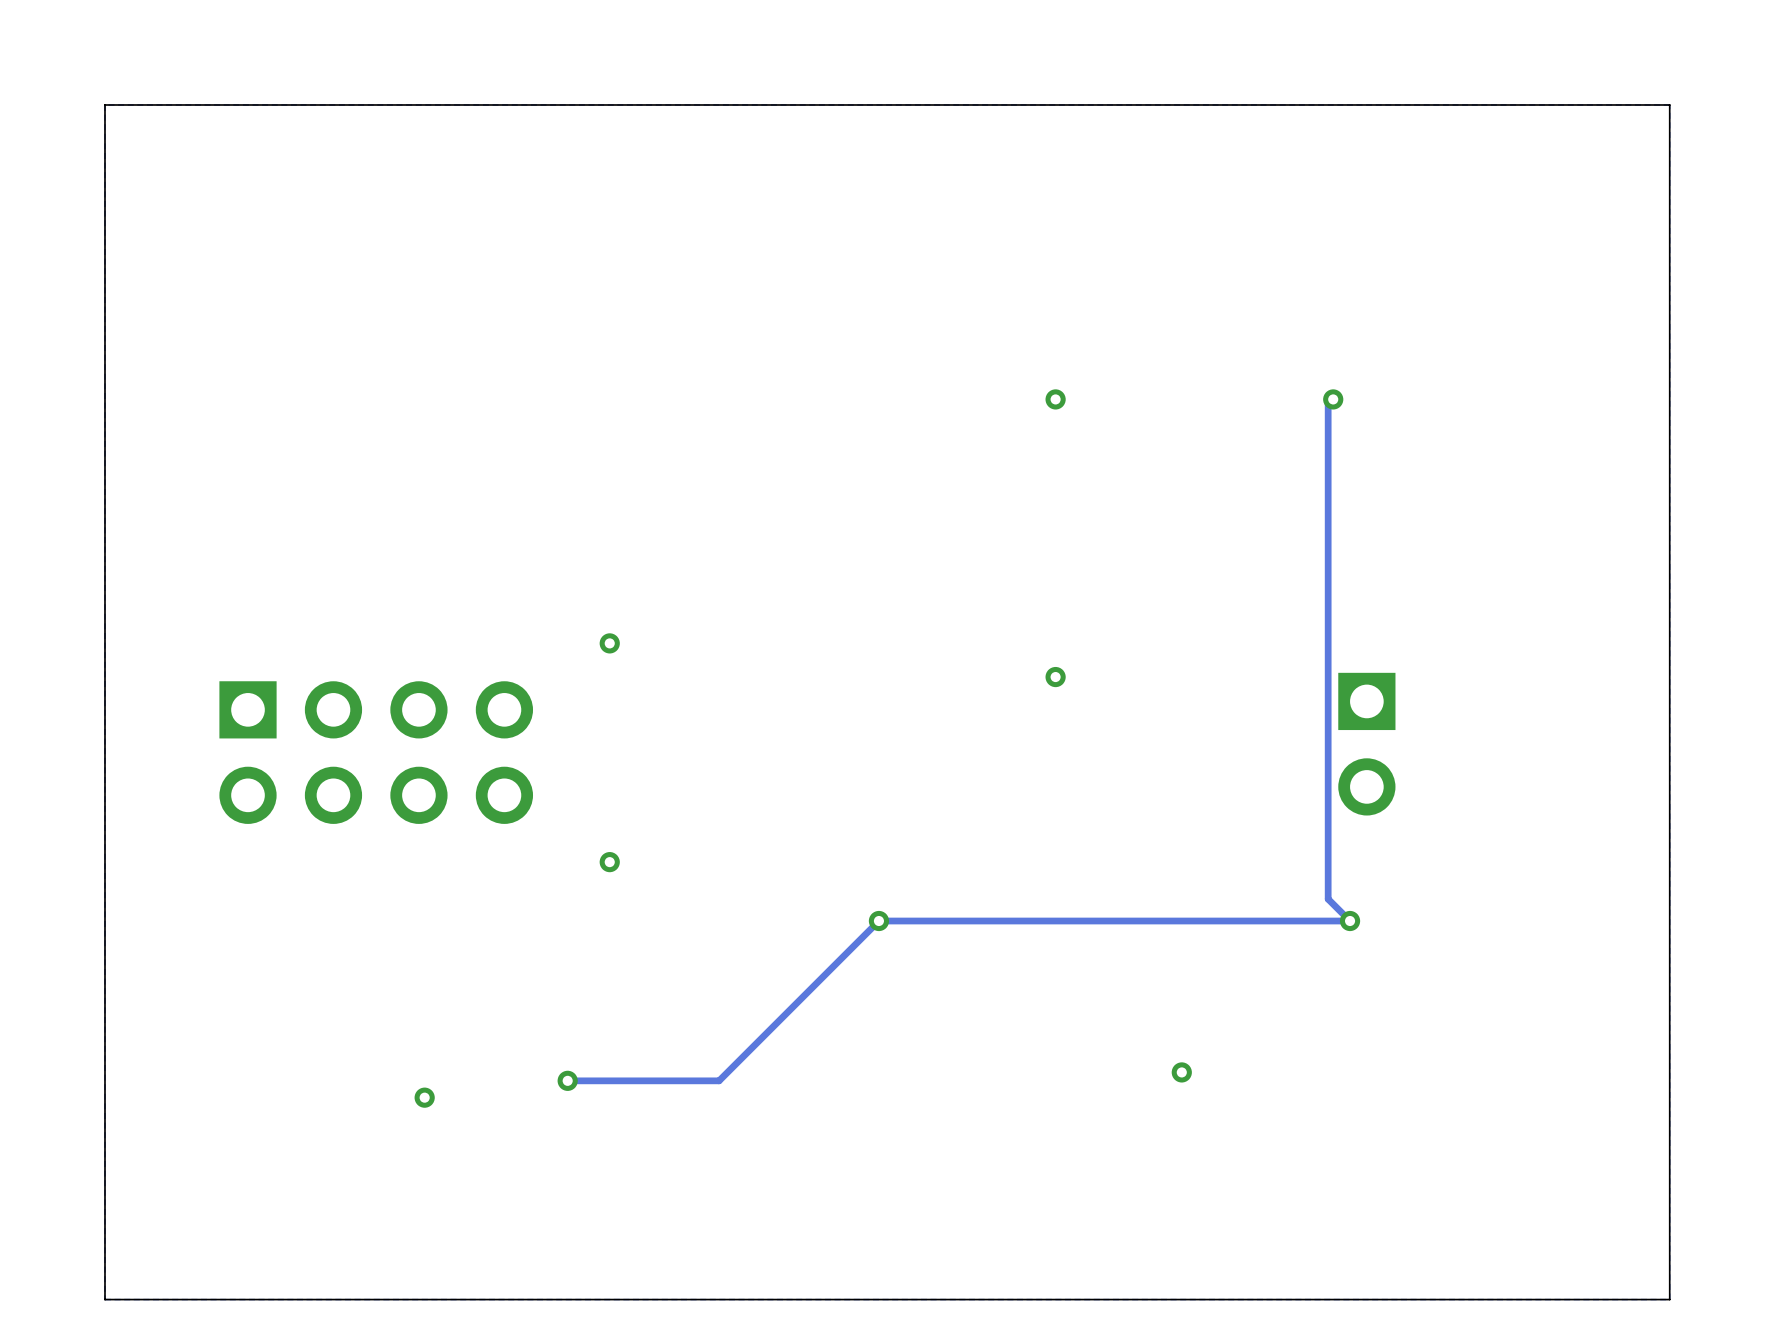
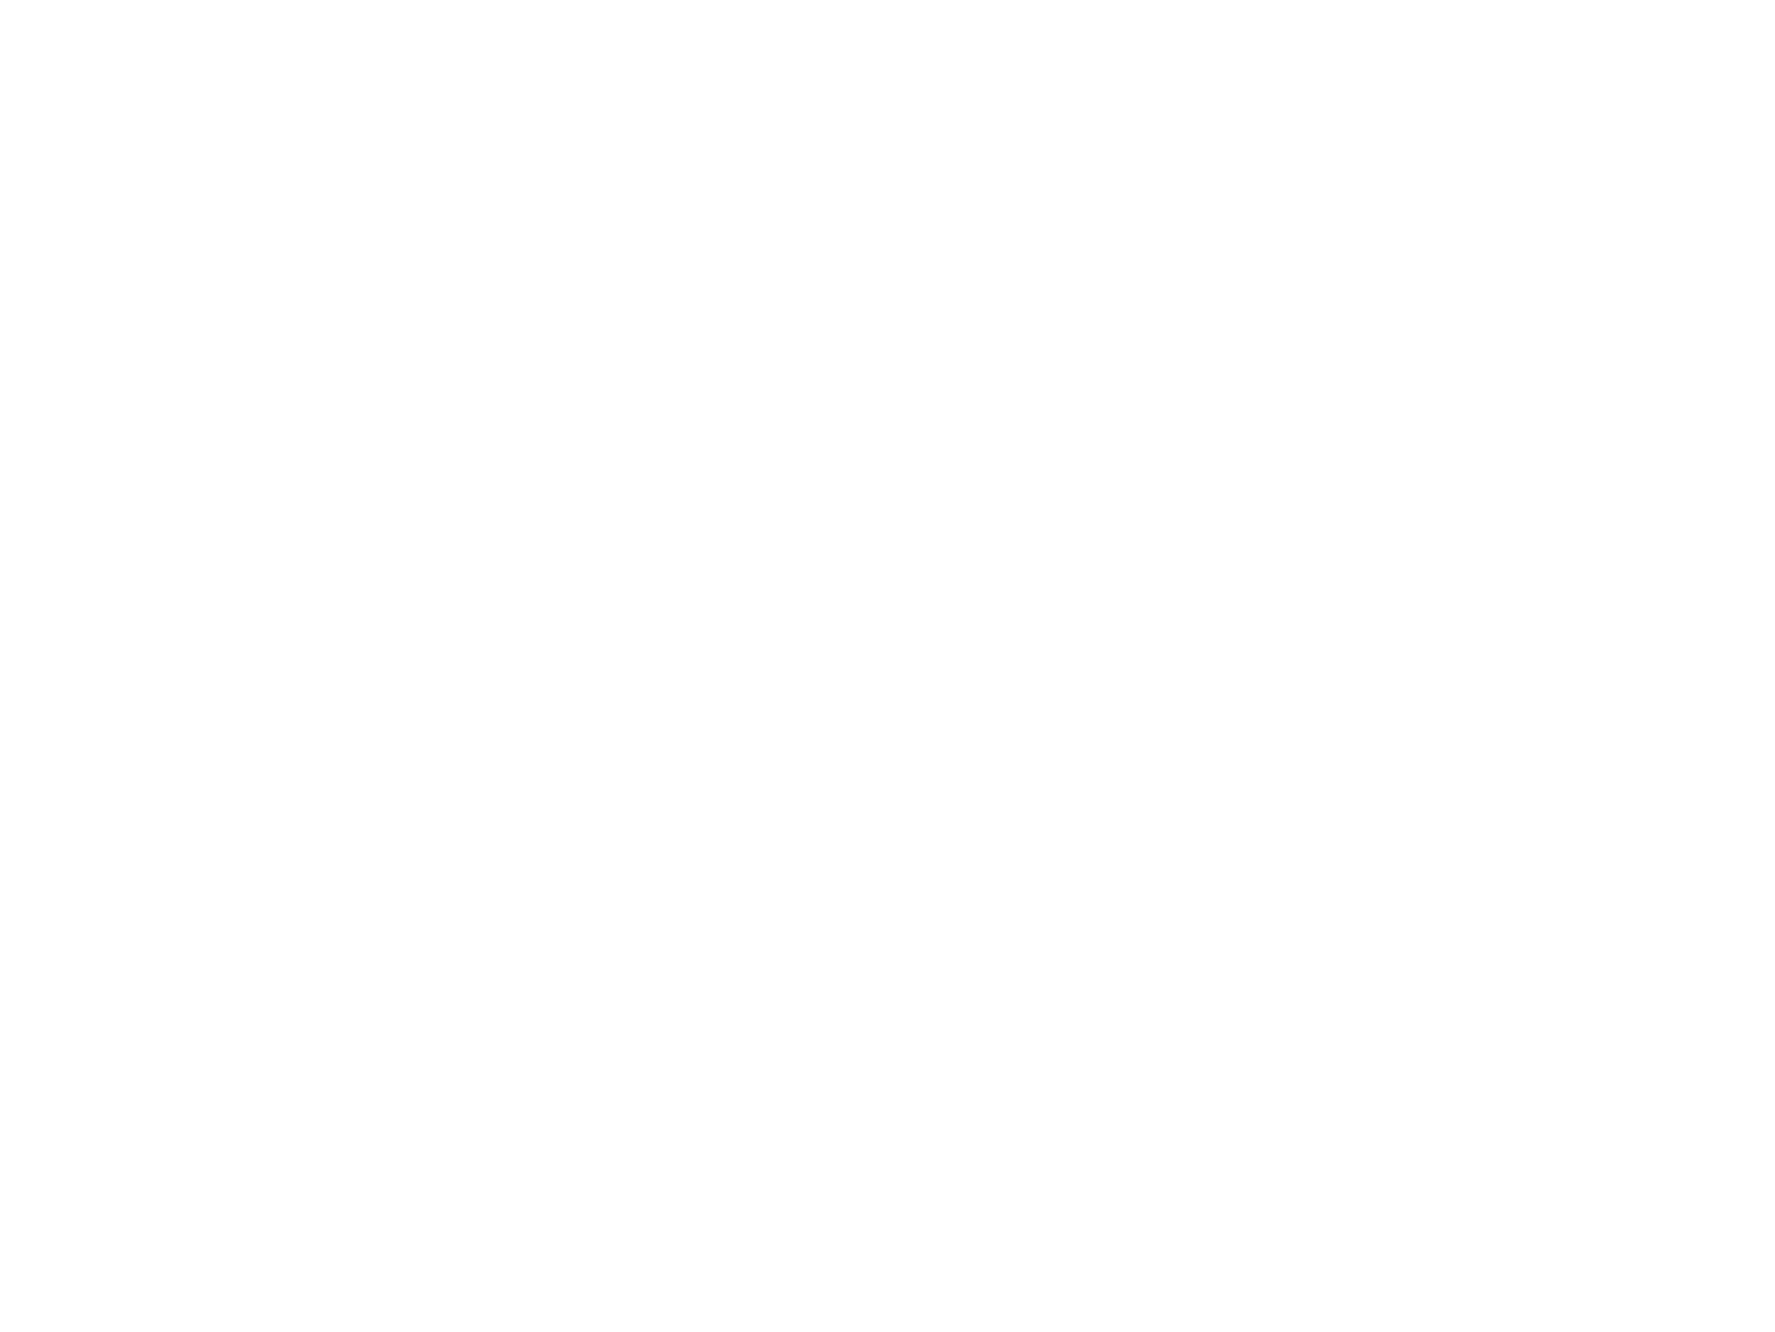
board edge: (1669, 104) (104, 104) (104, 1299) (1669, 1299) (1669, 104) -> none
via: (1055, 399) -> none
track: (1333, 399) (1328, 404) (1328, 899) (1350, 921) (878, 921) (719, 1080) (567, 1080) -> none
via: (1333, 399) -> none
via: (609, 643) -> none
via: (1055, 677) -> none
part: (1366, 744) -> none
part: (376, 752) -> none
via: (609, 862) -> none
via: (878, 921) -> none
via: (1350, 921) -> none
via: (1181, 1072) -> none
via: (567, 1080) -> none
via: (424, 1097) -> none

